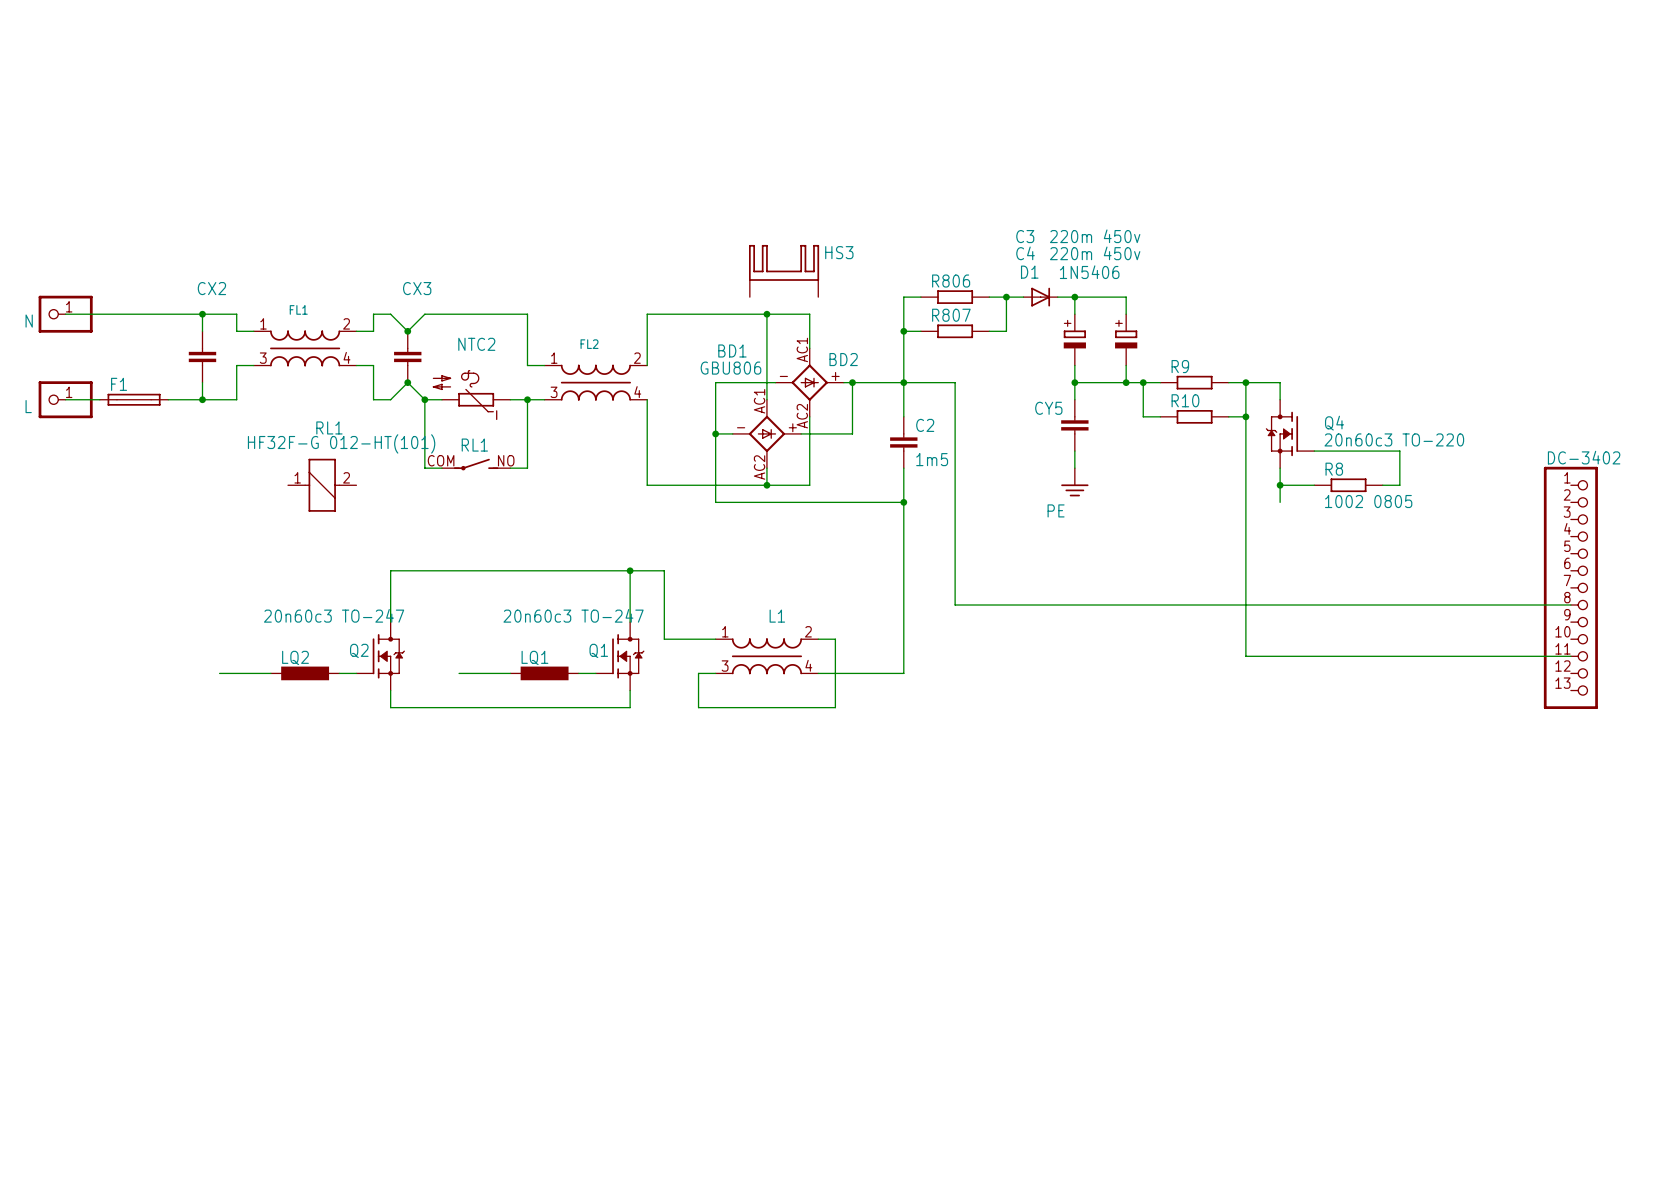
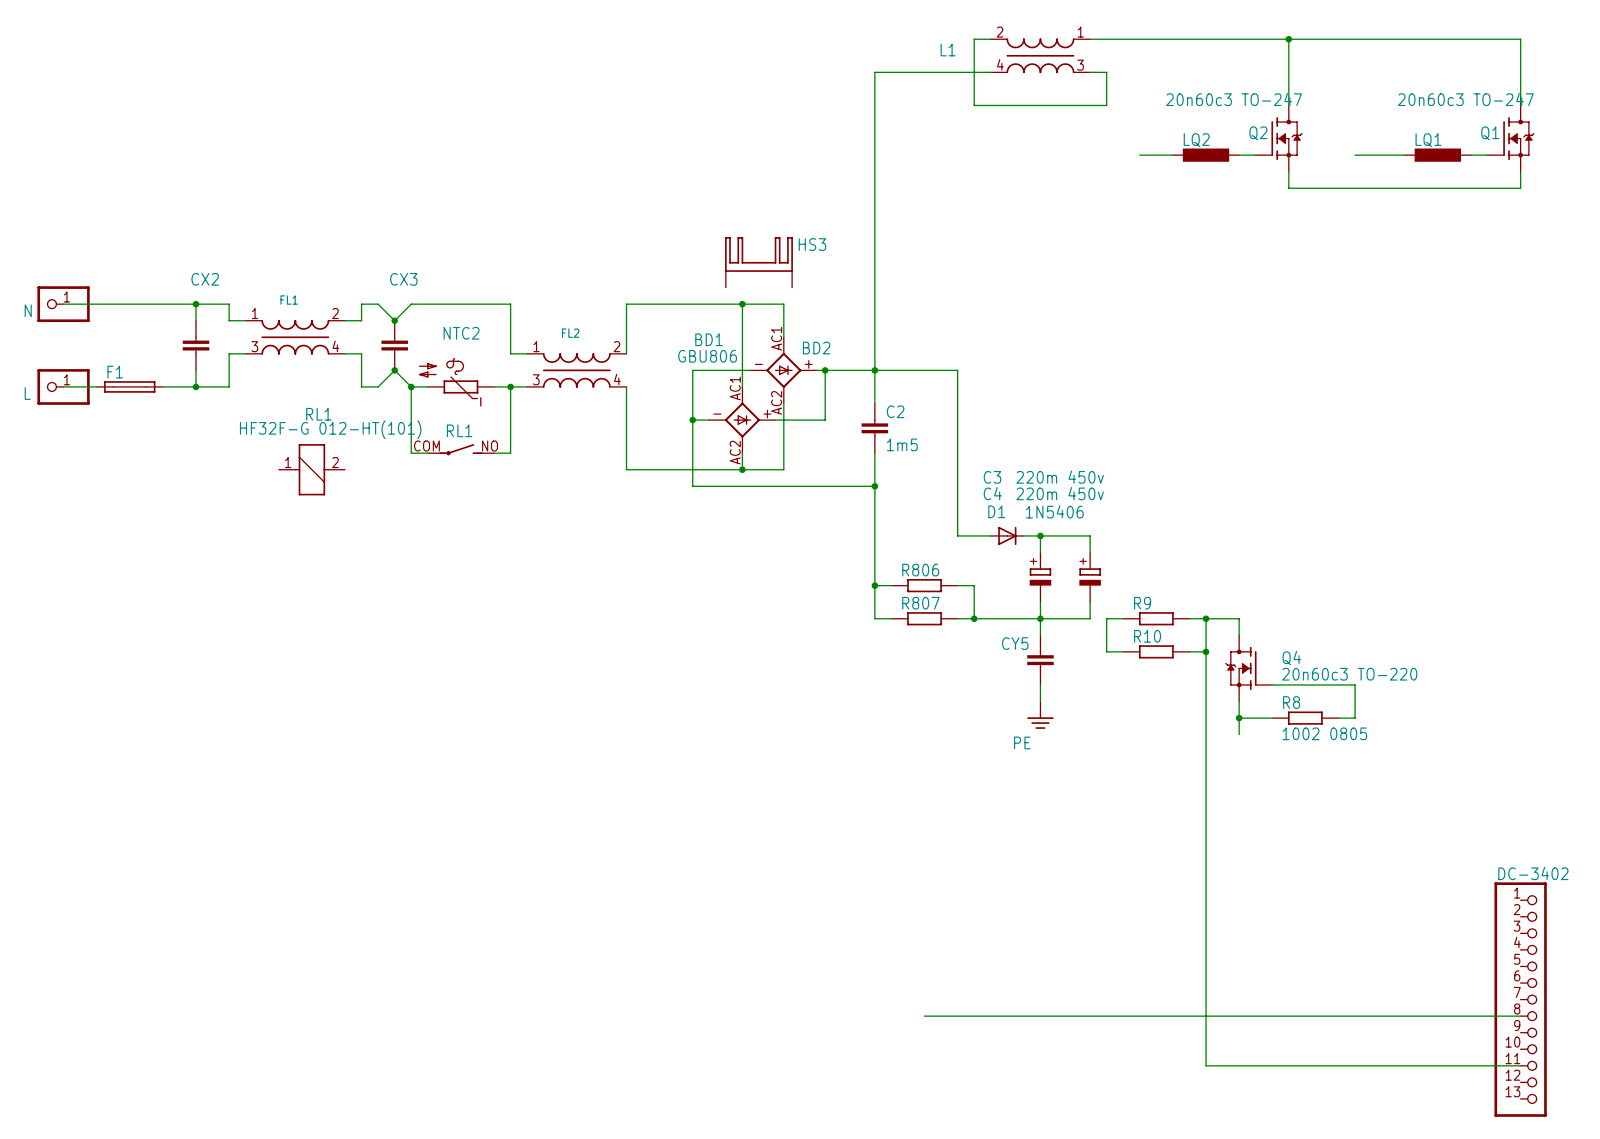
wire: none -> (990, 39) (974, 39) (974, 105) (1106, 105) (1106, 72) (1090, 72)
wire: none -> (1090, 39) (1520, 39) (1520, 105)
wire: none -> (1288, 39) (1288, 105)
junction: none -> (1288, 39)
wire: none -> (1139, 155) (1172, 155)
wire: none -> (1239, 155) (1255, 155)
wire: none -> (1355, 155) (1404, 155)
wire: none -> (1470, 155) (1487, 155)
wire: none -> (1288, 171) (1288, 188) (1520, 188) (1520, 171)
wire: (903, 297) (920, 297) -> (874, 287) (874, 72) (990, 72)
R806 position: (955, 297) -> (924, 585)
wire: (989, 297) (1023, 297) -> none
wire: (1006, 297) (1006, 331) (989, 331) -> none
junction: (1006, 297) -> none
D1 position: (1040, 297) -> (1007, 535)
wire: (1057, 297) (1126, 297) (1126, 314) -> none
wire: (1074, 297) (1074, 314) -> none
junction: (1074, 297) -> none
wire: (903, 331) (920, 331) -> none
junction: (903, 331) -> none
R807 position: (955, 331) -> (924, 618)
C3 position: (1074, 339) -> (1040, 577)
C4 position: (1126, 339) -> (1090, 577)
wire: (1074, 365) (1074, 399) -> none
wire: (1126, 365) (1126, 382) -> none
wire: (955, 382) (955, 605) (989, 605) -> (924, 370) (957, 370) (957, 535) (990, 535)
wire: (1074, 382) (1160, 382) -> none
junction: (1074, 382) -> none
junction: (1126, 382) -> none
wire: (1143, 382) (1143, 416) (1160, 416) -> none
junction: (1143, 382) -> none
R9 position: (1194, 382) -> (1156, 618)
wire: (1228, 382) (1280, 382) (1280, 399) -> none
wire: (1245, 382) (1245, 639) -> none
junction: (1245, 382) -> none
R10 position: (1194, 416) -> (1156, 651)
wire: (1228, 416) (1245, 416) -> none
junction: (1245, 416) -> none
CY5 position: (1074, 425) -> (1040, 660)
Q4 position: (1290, 433) -> (1248, 668)
wire: (1074, 451) (1074, 468) -> (1040, 535) (1040, 552)
wire: (1314, 451) (1399, 451) (1399, 485) (1382, 485) -> none
wire: (1280, 468) (1280, 502) -> none
power symbol: PE (1074, 482) -> none
wire: (1280, 485) (1314, 485) -> none
junction: (1280, 485) -> none
R8 position: (1348, 485) -> (1305, 718)
wire: none -> (1023, 535) (1090, 535) (1090, 552)
junction: none -> (1040, 535)
wire: (630, 570) (630, 622) -> none
junction: (630, 570) -> none
DC-3402 position: (1570, 587) -> (1520, 999)
wire: none -> (874, 585) (891, 585)
junction: none -> (874, 585)
wire: (1006, 605) (1570, 605) -> (974, 585) (974, 618)
L1 name position: L1 (777, 616) -> L1 (948, 50)
wire: (390, 622) (390, 570) (664, 570) (664, 639) (715, 639) -> none
wire: none -> (1040, 602) (1040, 635)
wire: none -> (1090, 602) (1090, 618) (957, 618)
wire: (818, 639) (835, 639) (835, 707) (698, 707) (698, 673) (715, 673) -> none
wire: (903, 639) (903, 673) (818, 673) -> (874, 618) (891, 618)
junction: none -> (974, 618)
junction: none -> (1040, 618)
wire: none -> (1123, 618) (1106, 618) (1106, 651) (1123, 651)
wire: none -> (1189, 618) (1239, 618) (1239, 635)
junction: none -> (1206, 618)
Q2 position: (380, 656) -> (1279, 138)
Q1 position: (620, 656) -> (1510, 138)
L1 flip: as is (766, 656) -> left-right (1040, 55)
L1 position: (766, 656) -> (1040, 55)
wire: (1245, 656) (1570, 656) -> (1206, 635) (1206, 1065) (1520, 1065)
wire: (219, 673) (270, 673) -> none
LQ2 position: (305, 673) -> (1206, 155)
wire: (339, 673) (356, 673) -> none
wire: (459, 673) (510, 673) -> none
LQ1 position: (544, 673) -> (1437, 155)
wire: (578, 673) (595, 673) -> none
wire: none -> (1189, 651) (1206, 651)
junction: none -> (1206, 651)
wire: (390, 690) (390, 707) (630, 707) (630, 690) -> none
wire: none -> (1040, 684) (1040, 701)
wire: none -> (1272, 684) (1355, 684) (1355, 718) (1338, 718)
wire: none -> (1239, 701) (1239, 734)
power symbol: none -> PE (1040, 715)
wire: none -> (1239, 718) (1272, 718)
junction: none -> (1239, 718)
wire: none -> (924, 1016) (1520, 1016)

